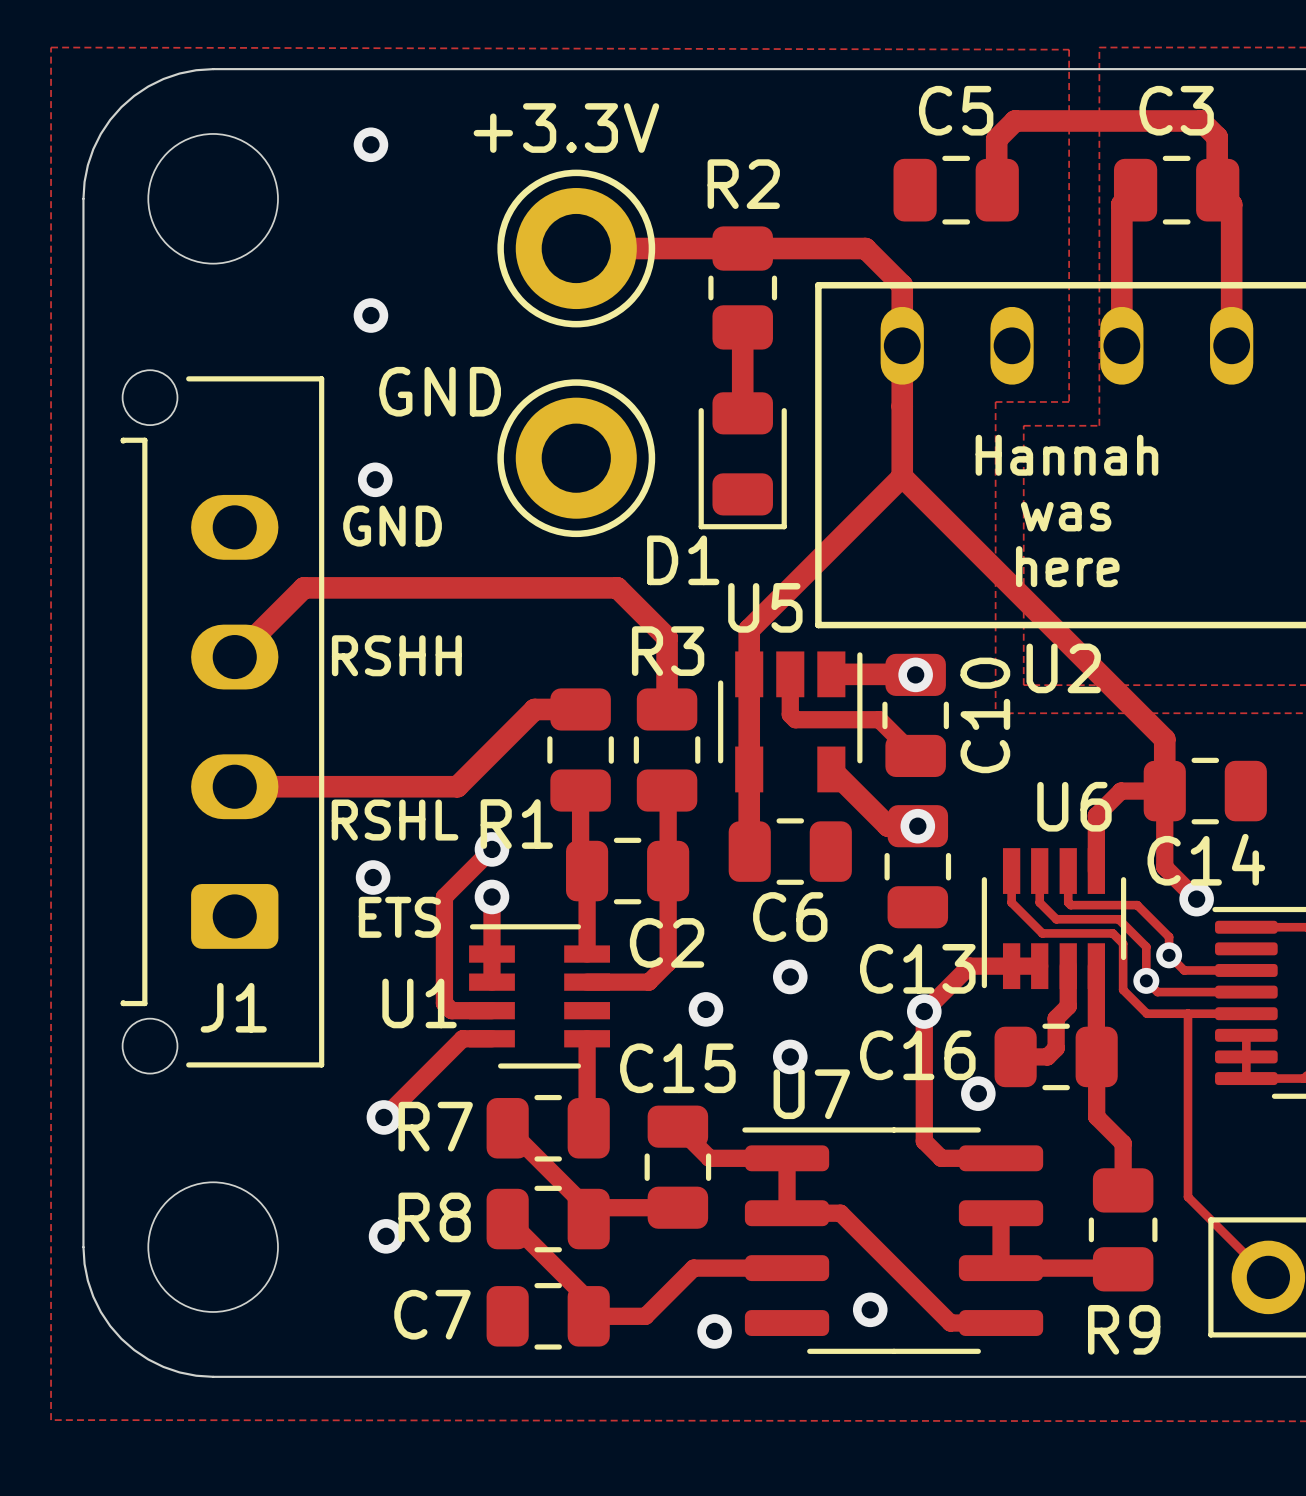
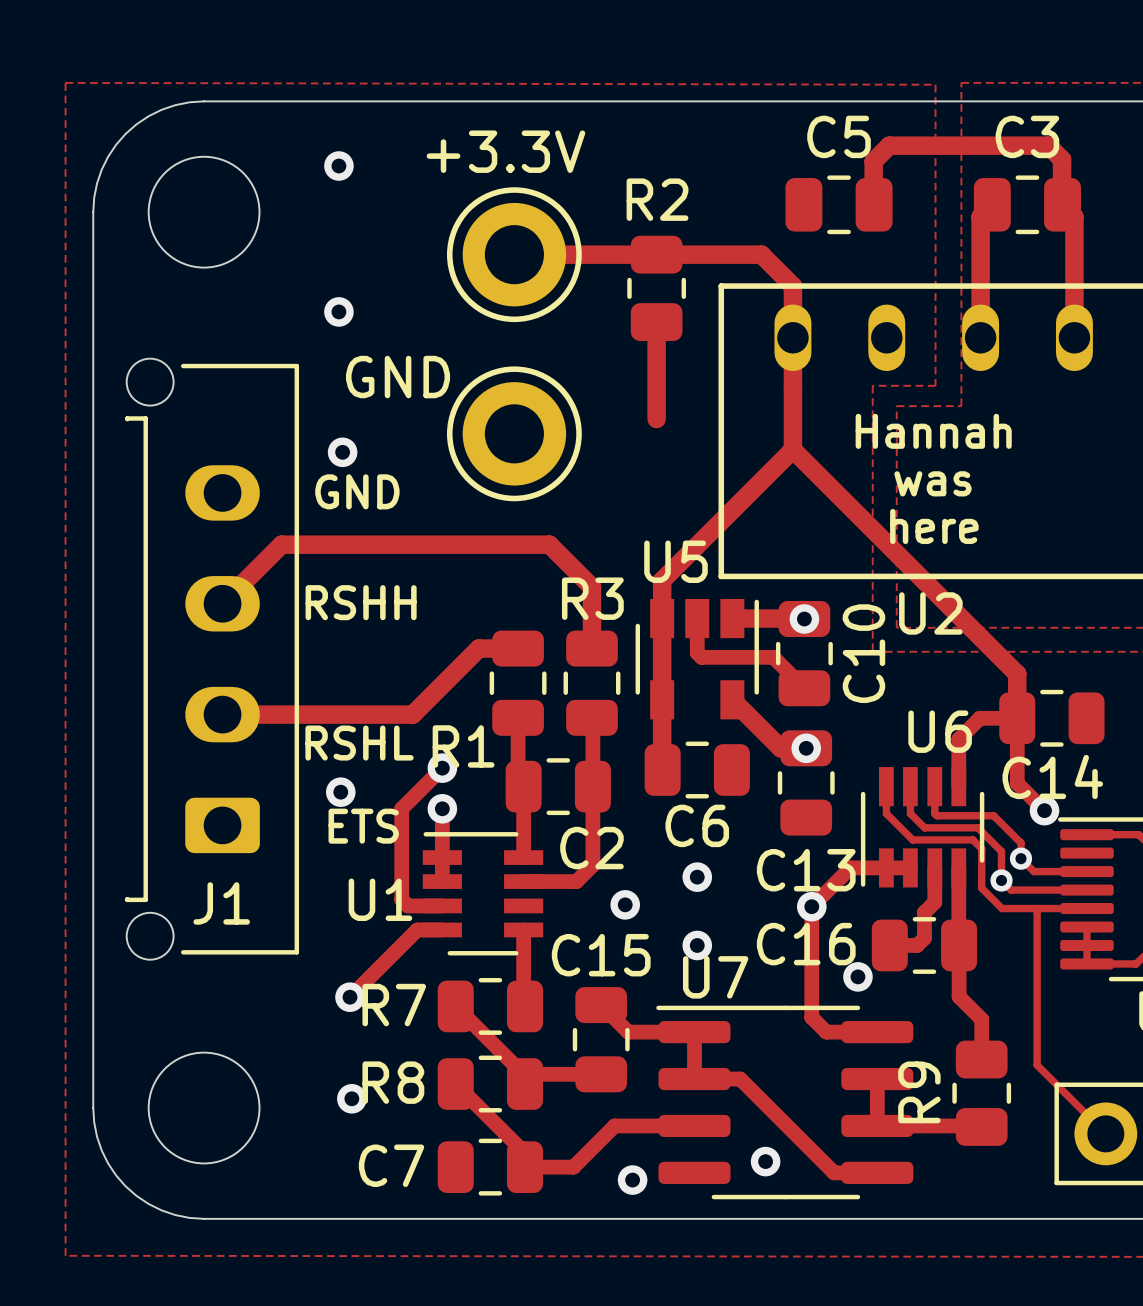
track: none -> (656, 395) (656, 419)
D1: (742, 460) -> none
R9 name rotation: 0° (1124, 1329) -> 90° counterclockwise (919, 1092)
R9 name position: R9 (1124, 1329) -> R9 (919, 1092)

